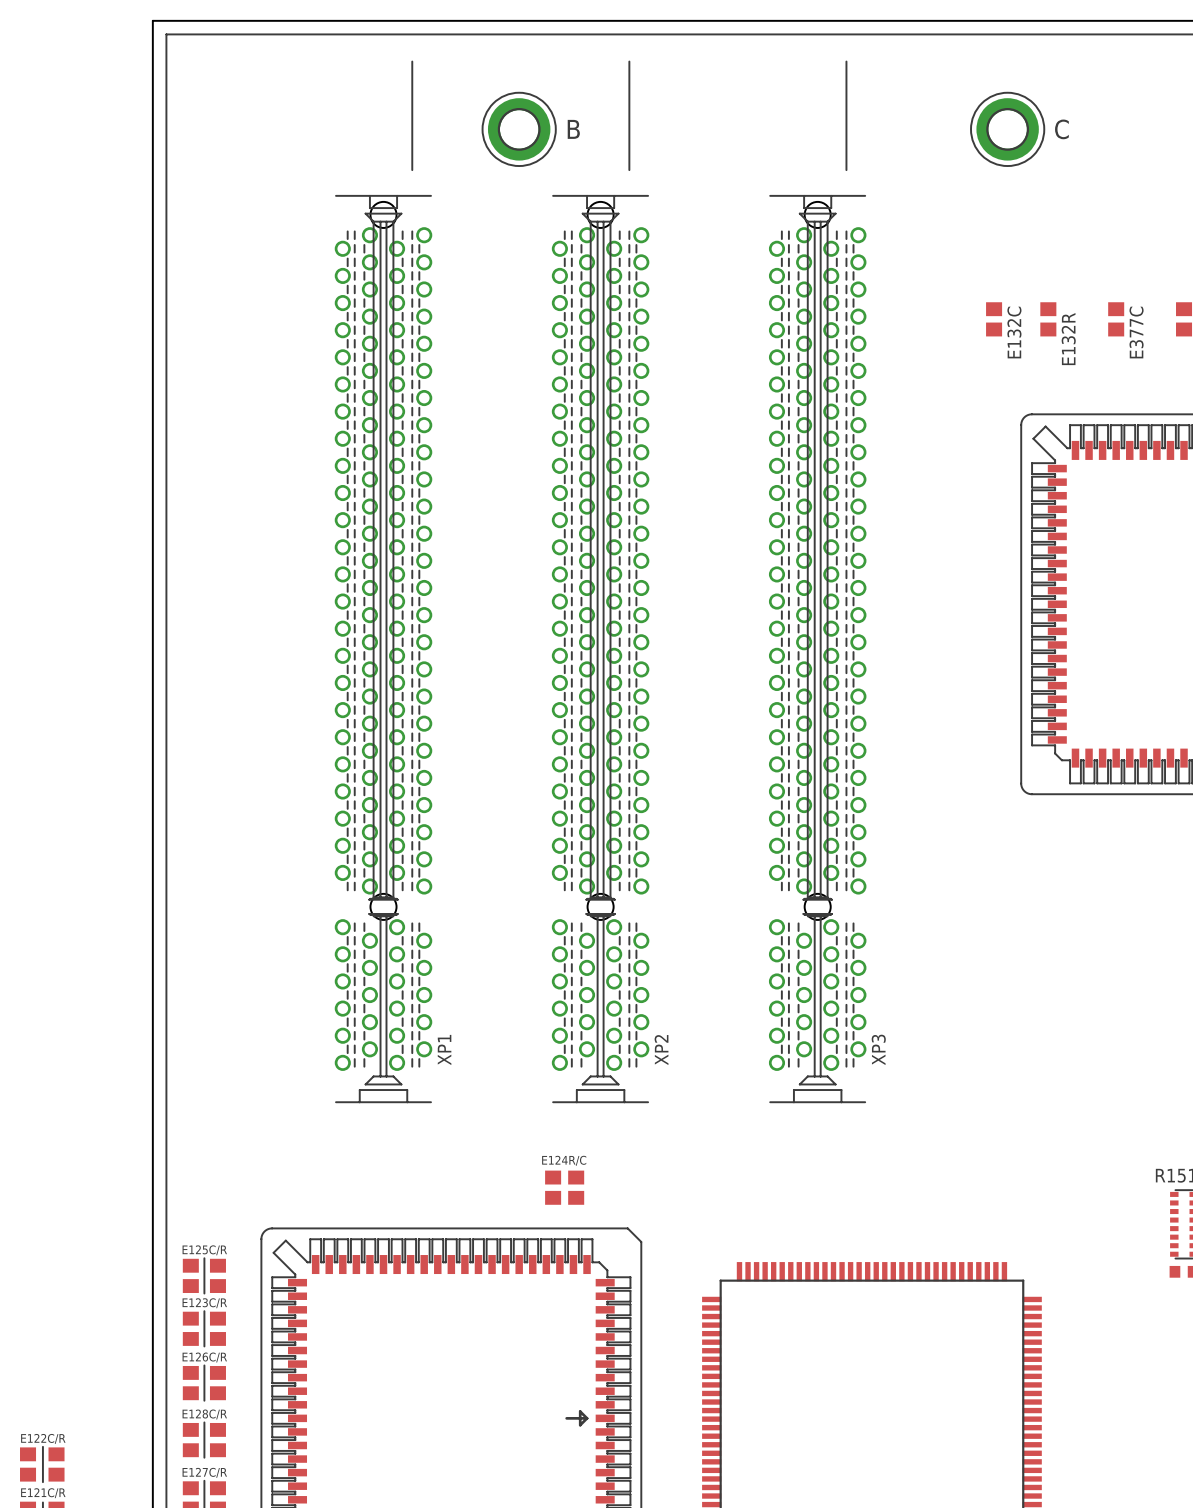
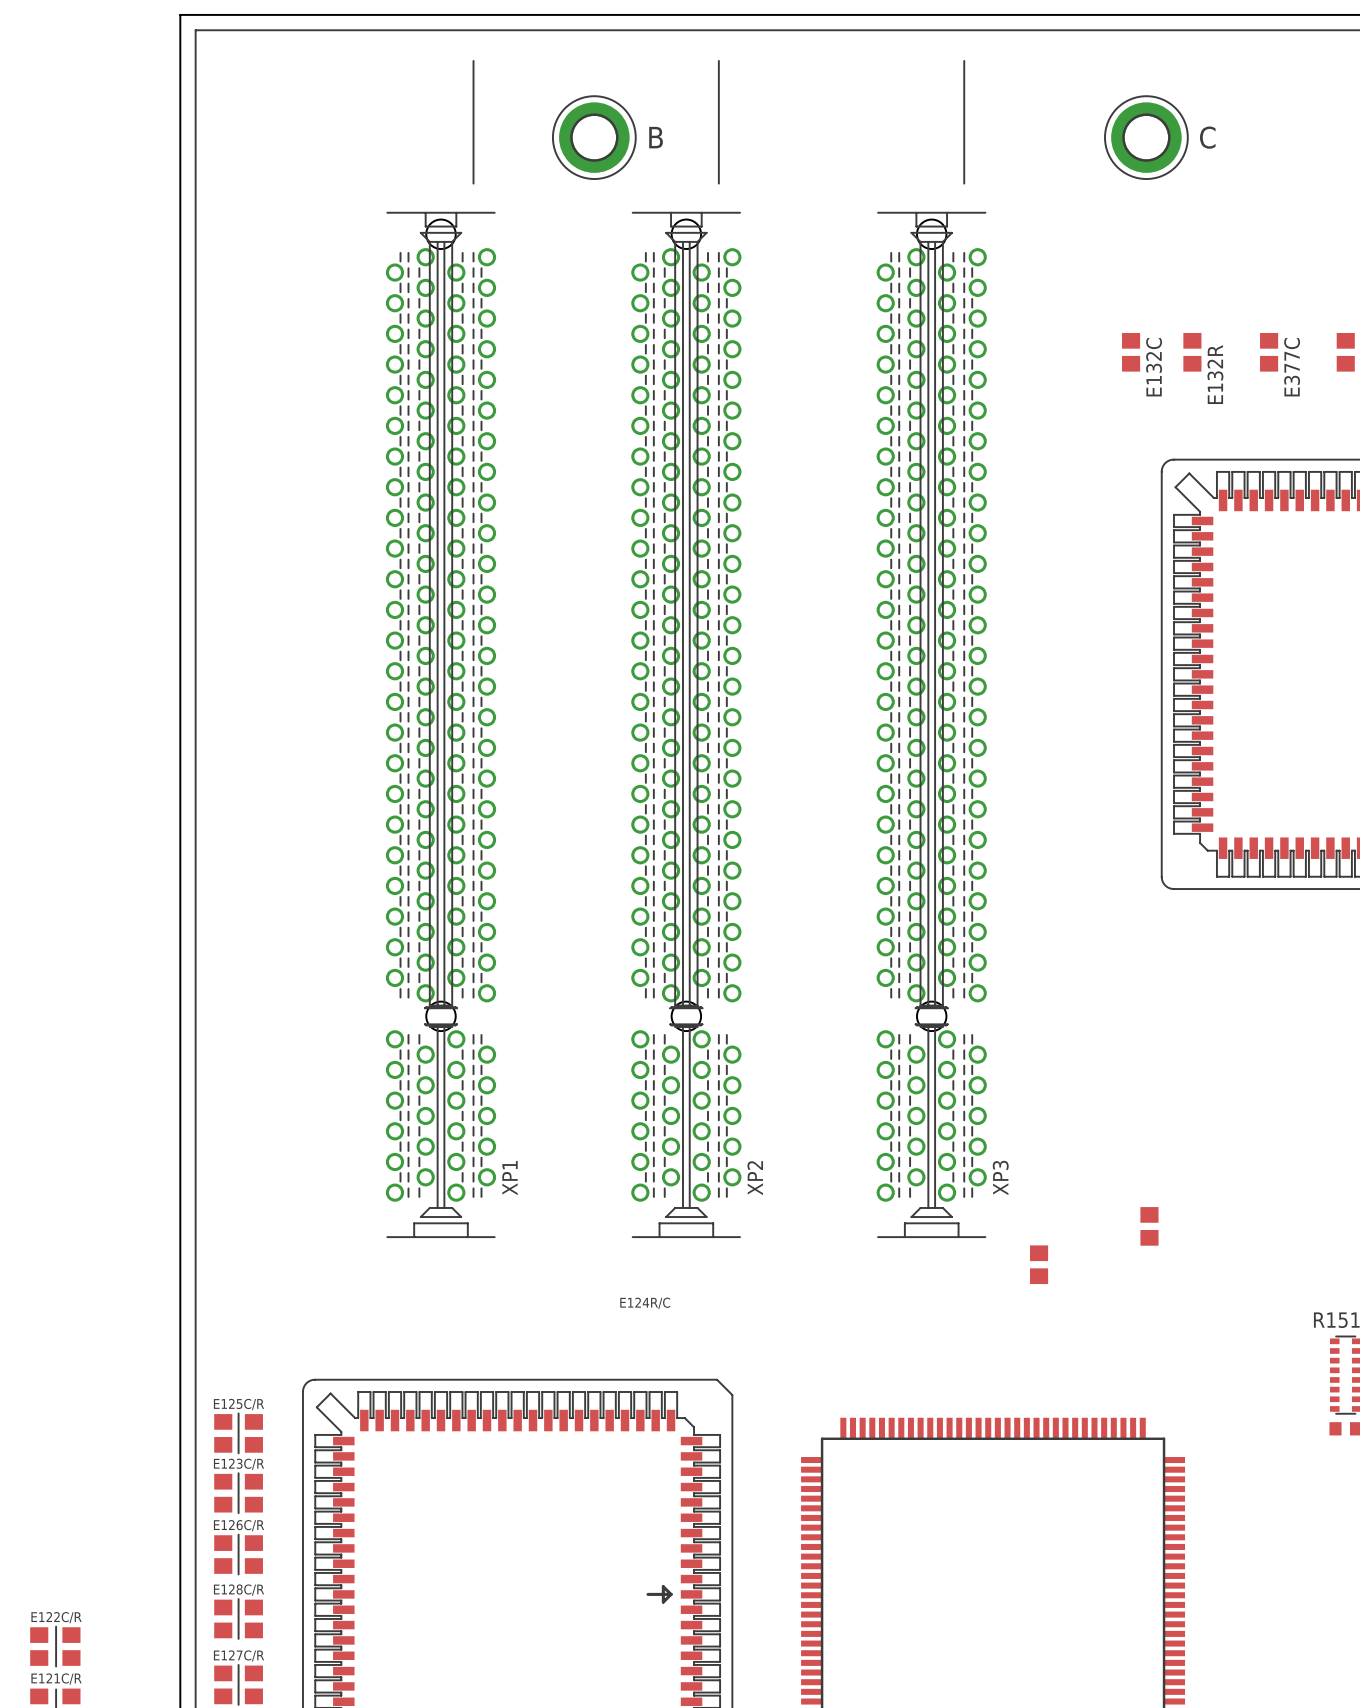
part: none -> (1149, 1226)
part: none -> (1039, 1264)
part: (553, 1187) -> none
part: (576, 1187) -> none

